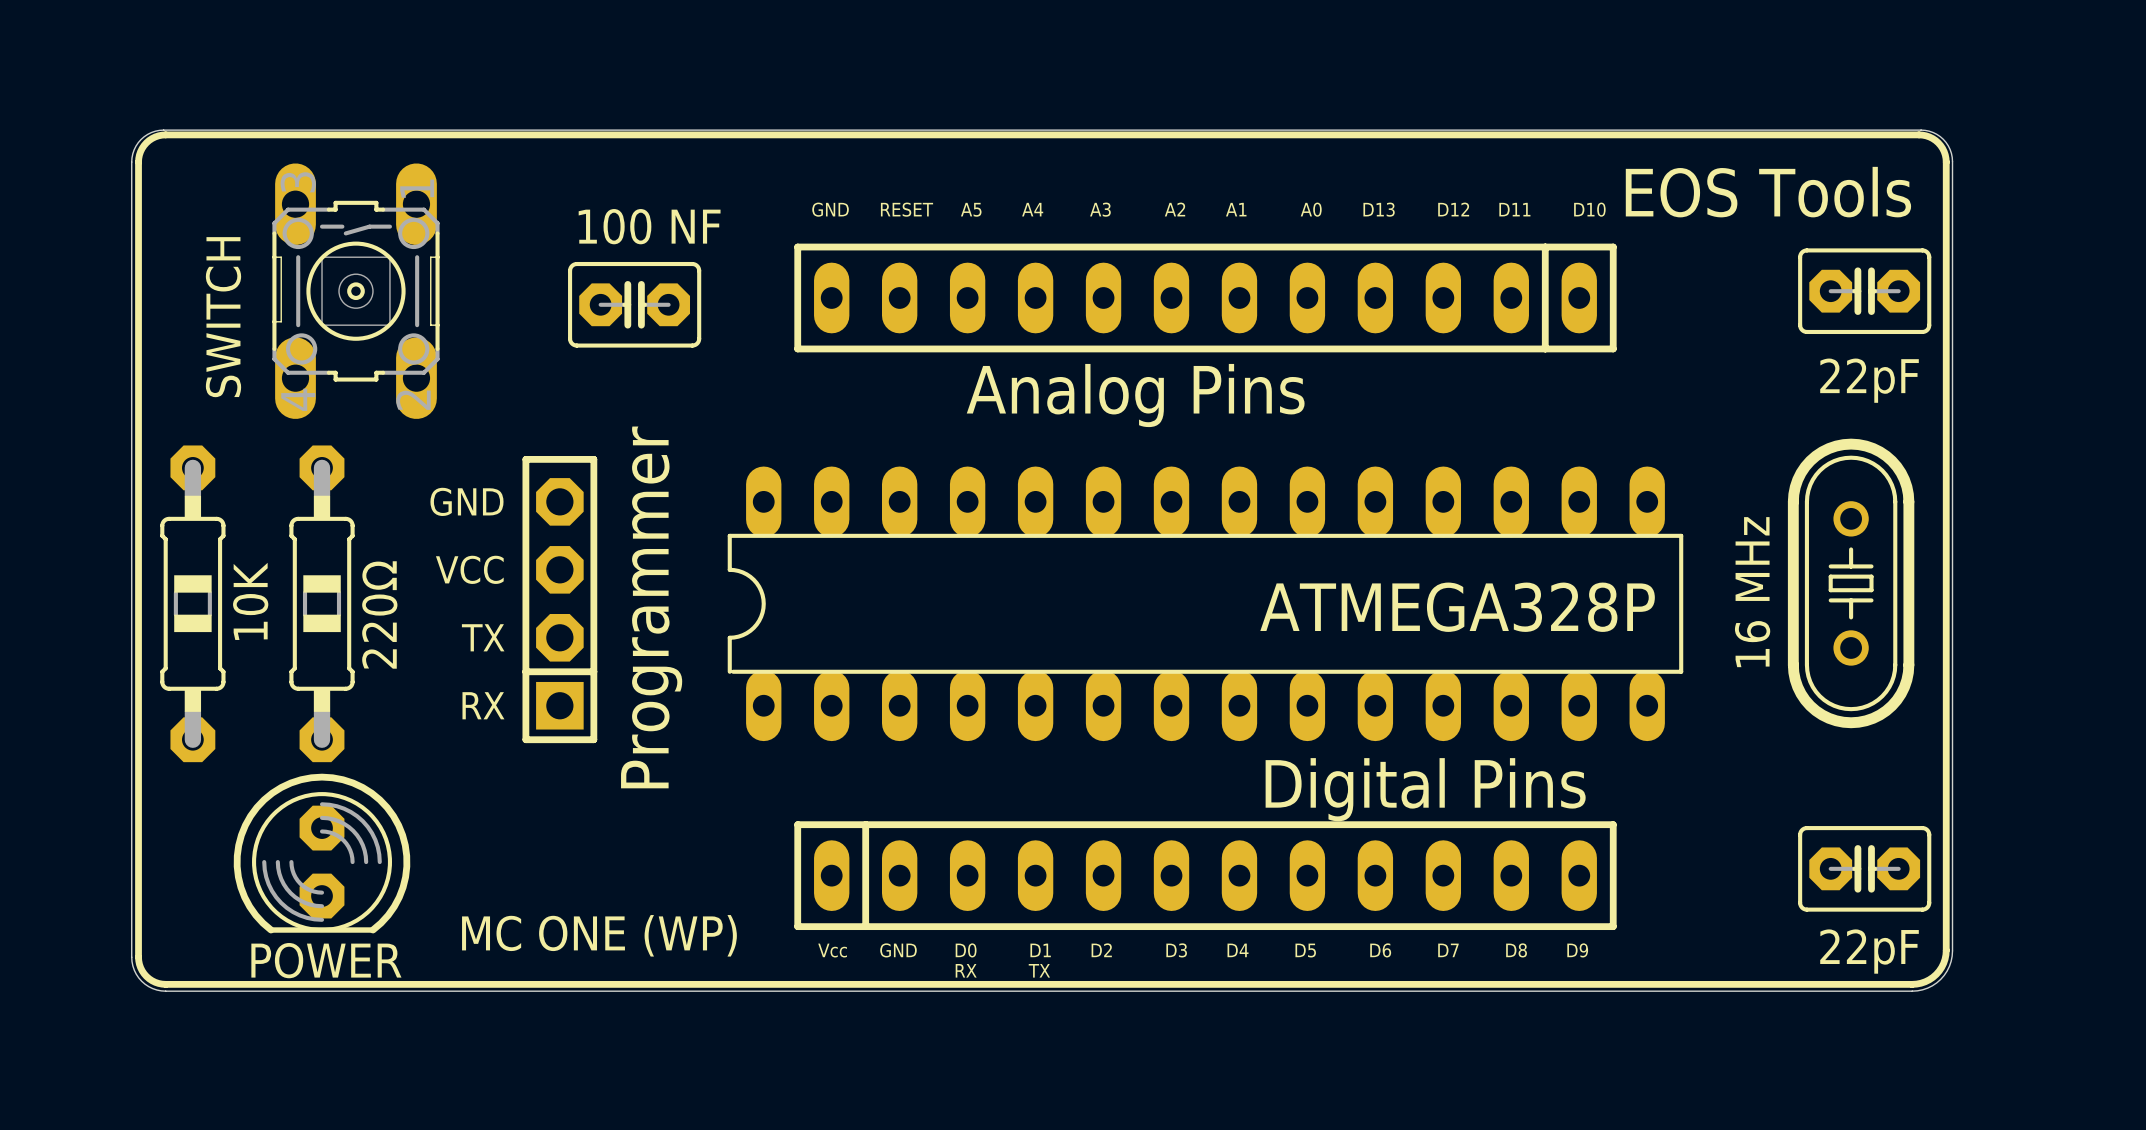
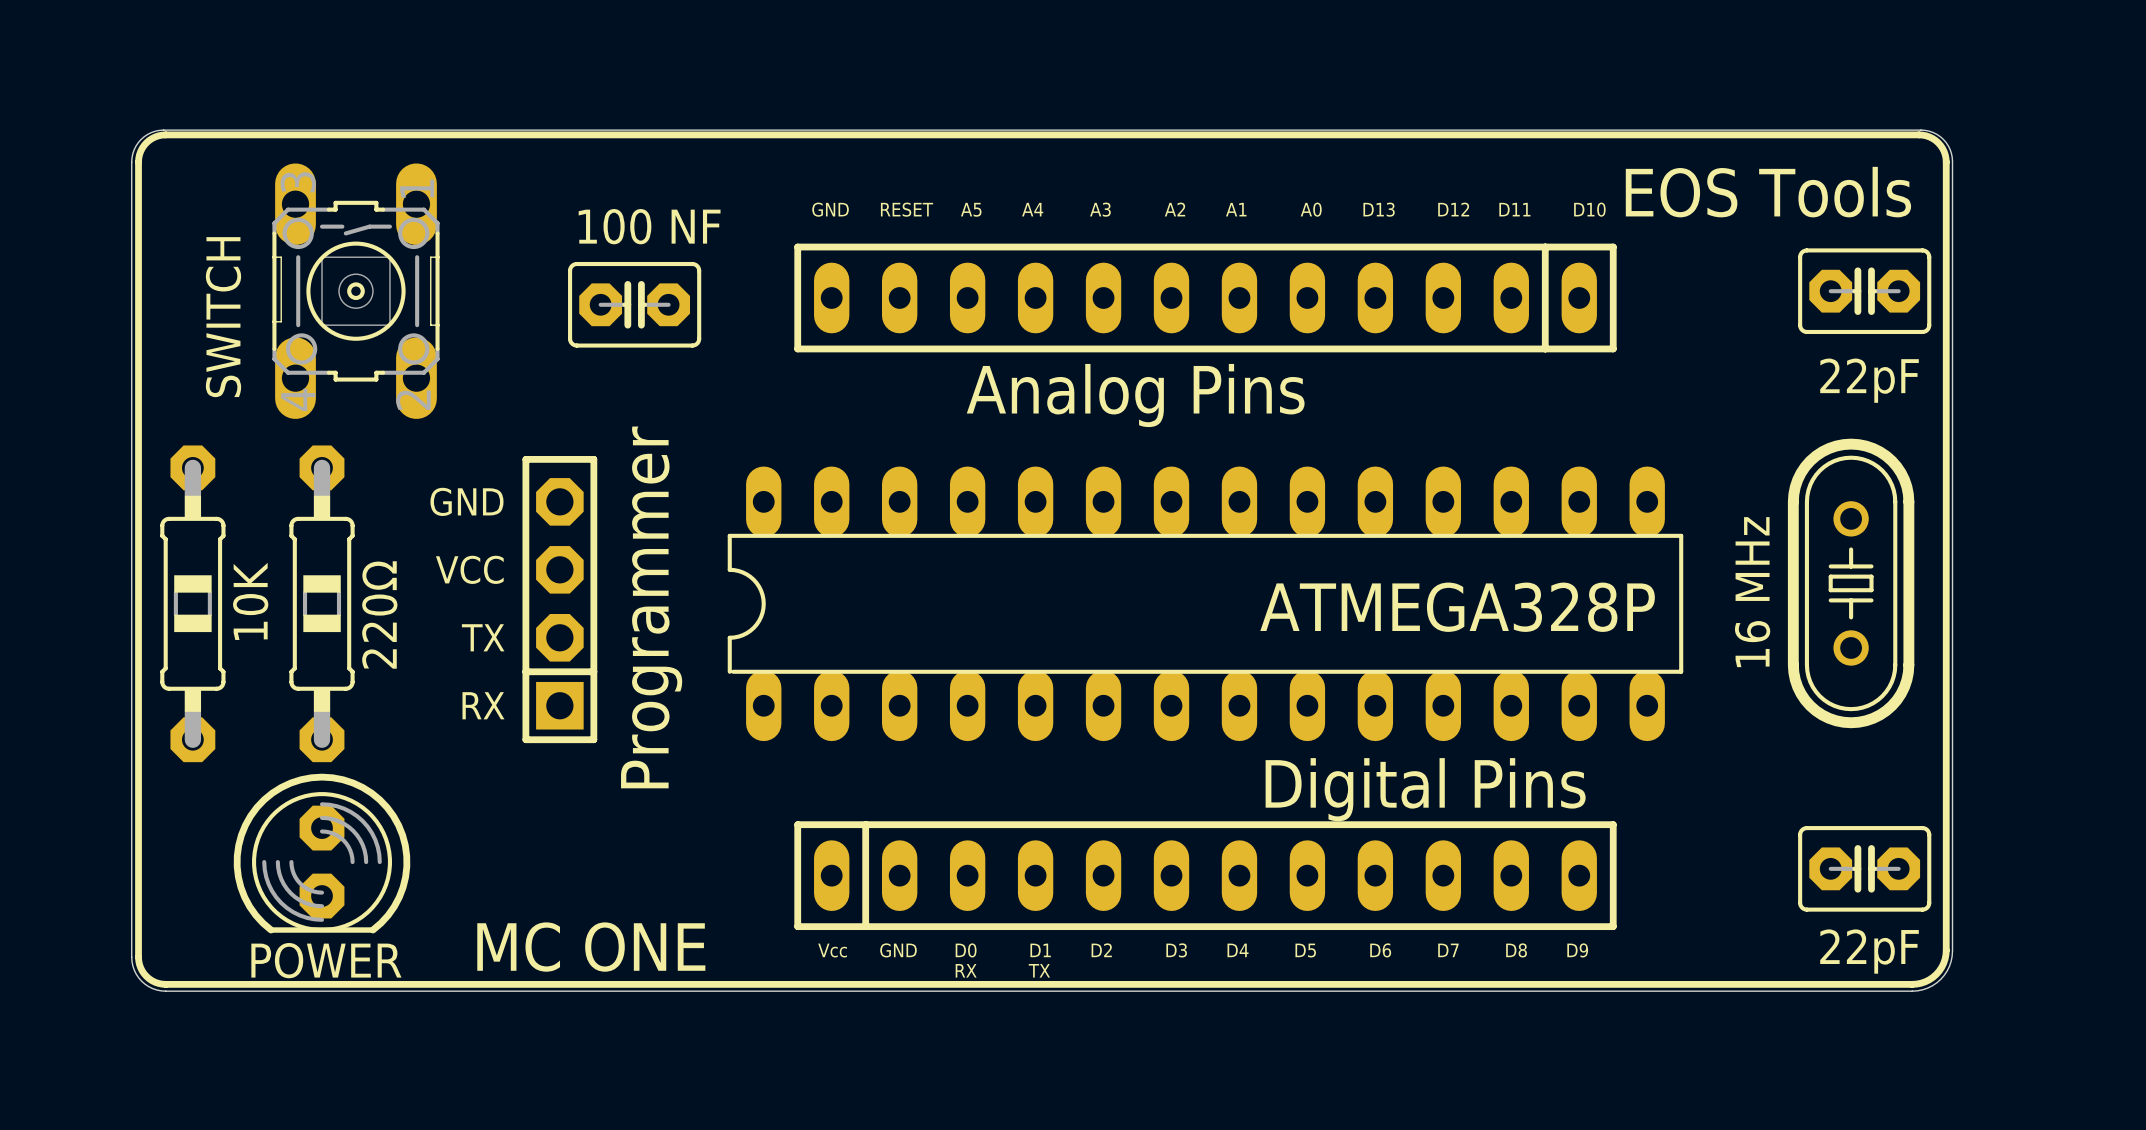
text: MC ONE (WP) (599, 935) -> MC ONE (591, 947)

